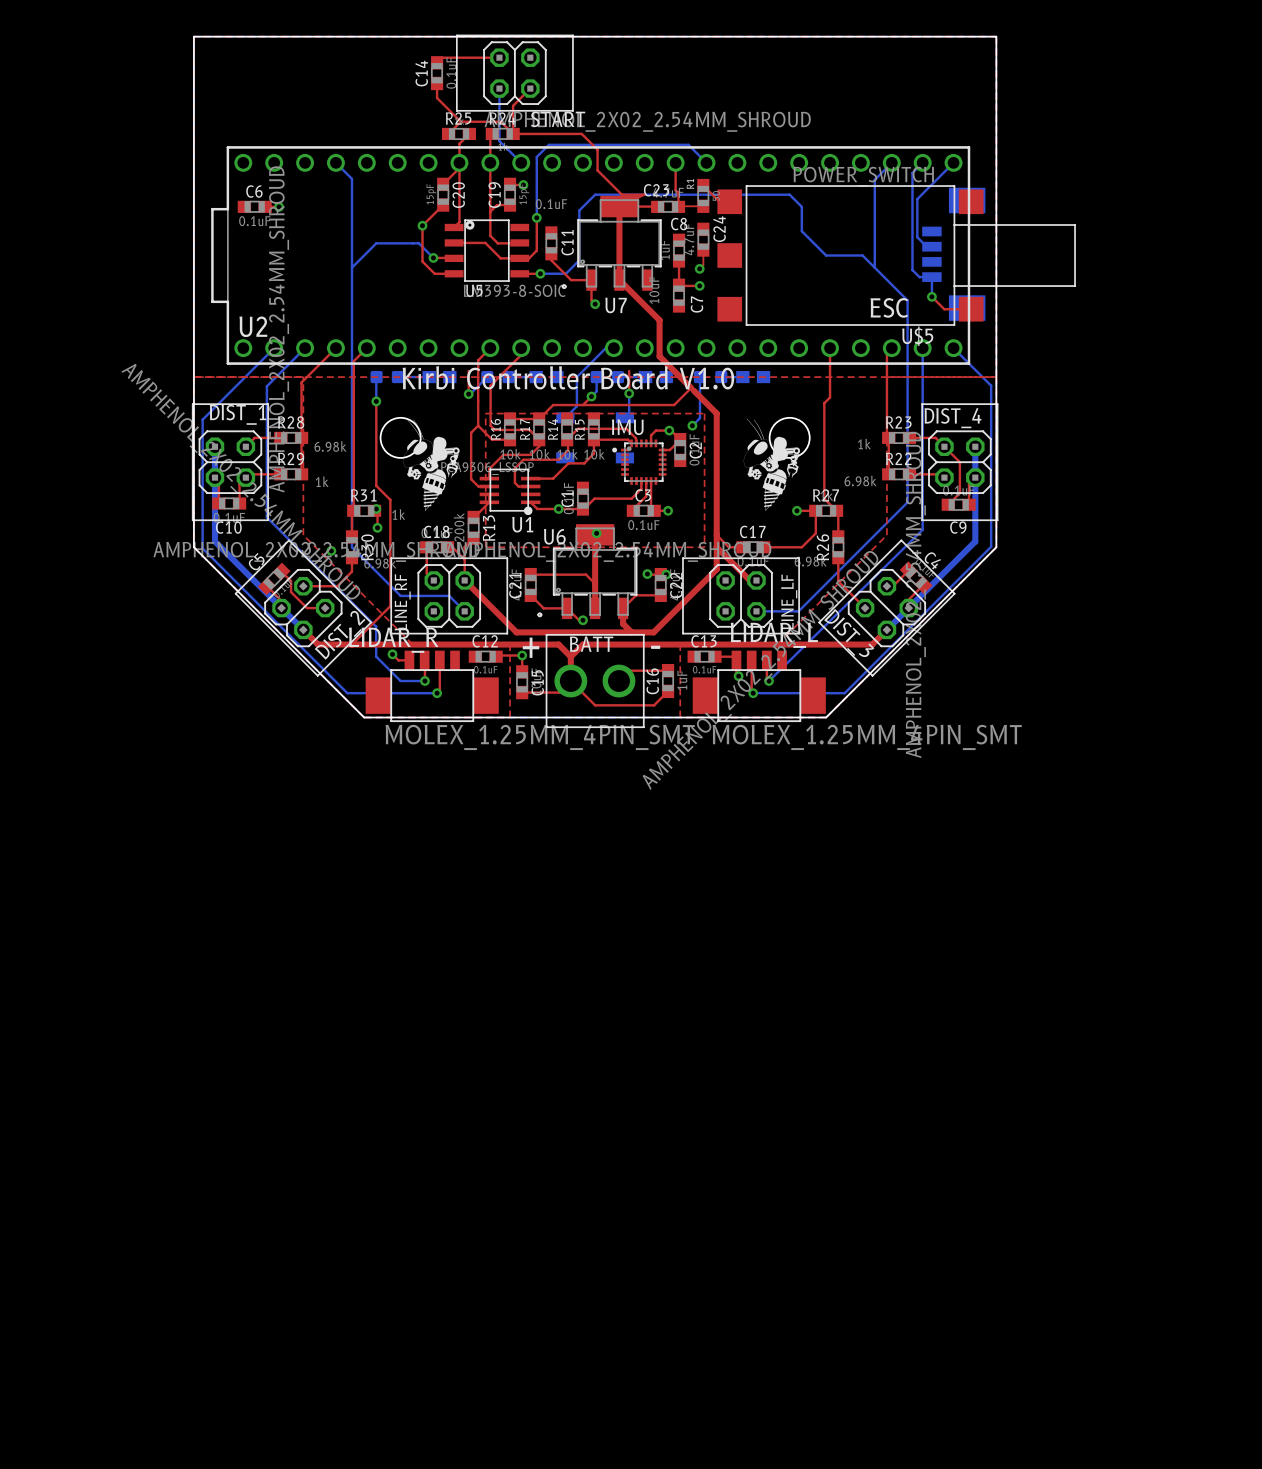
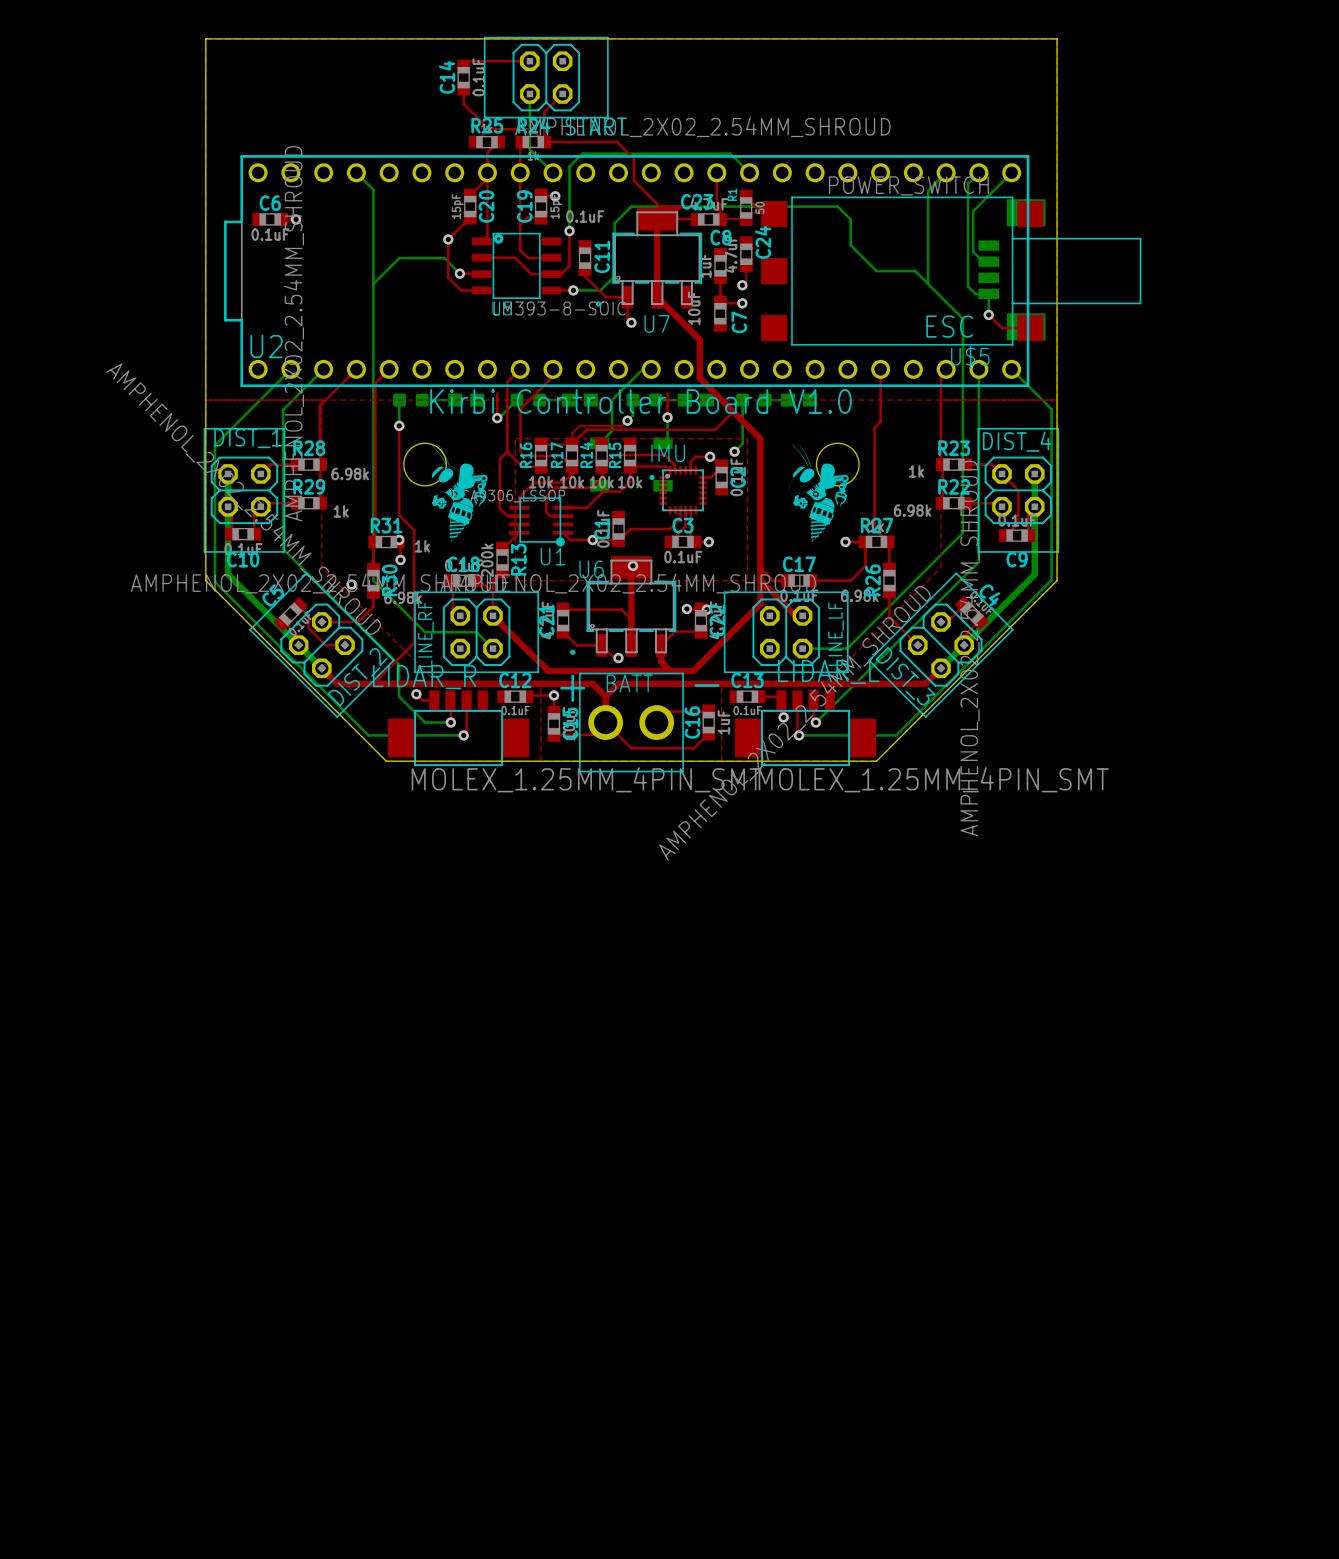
top track: (586, 401) (582, 405) -> (622, 425) (579, 425) (572, 433) (572, 444)

